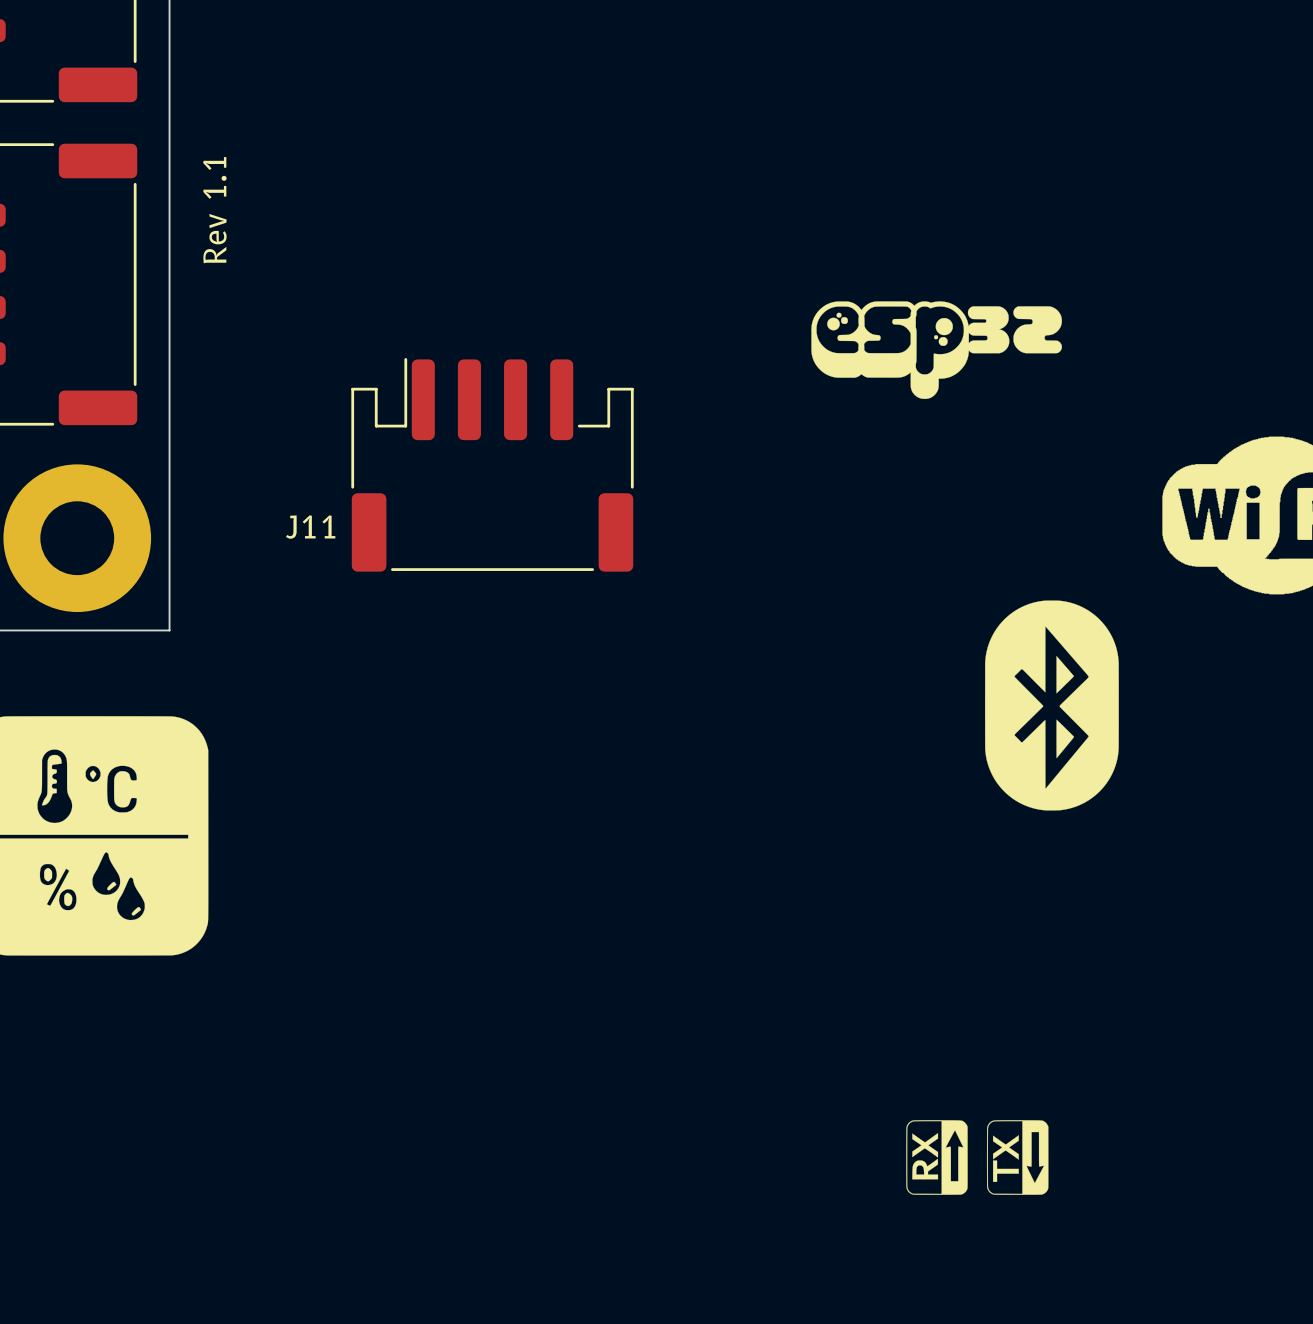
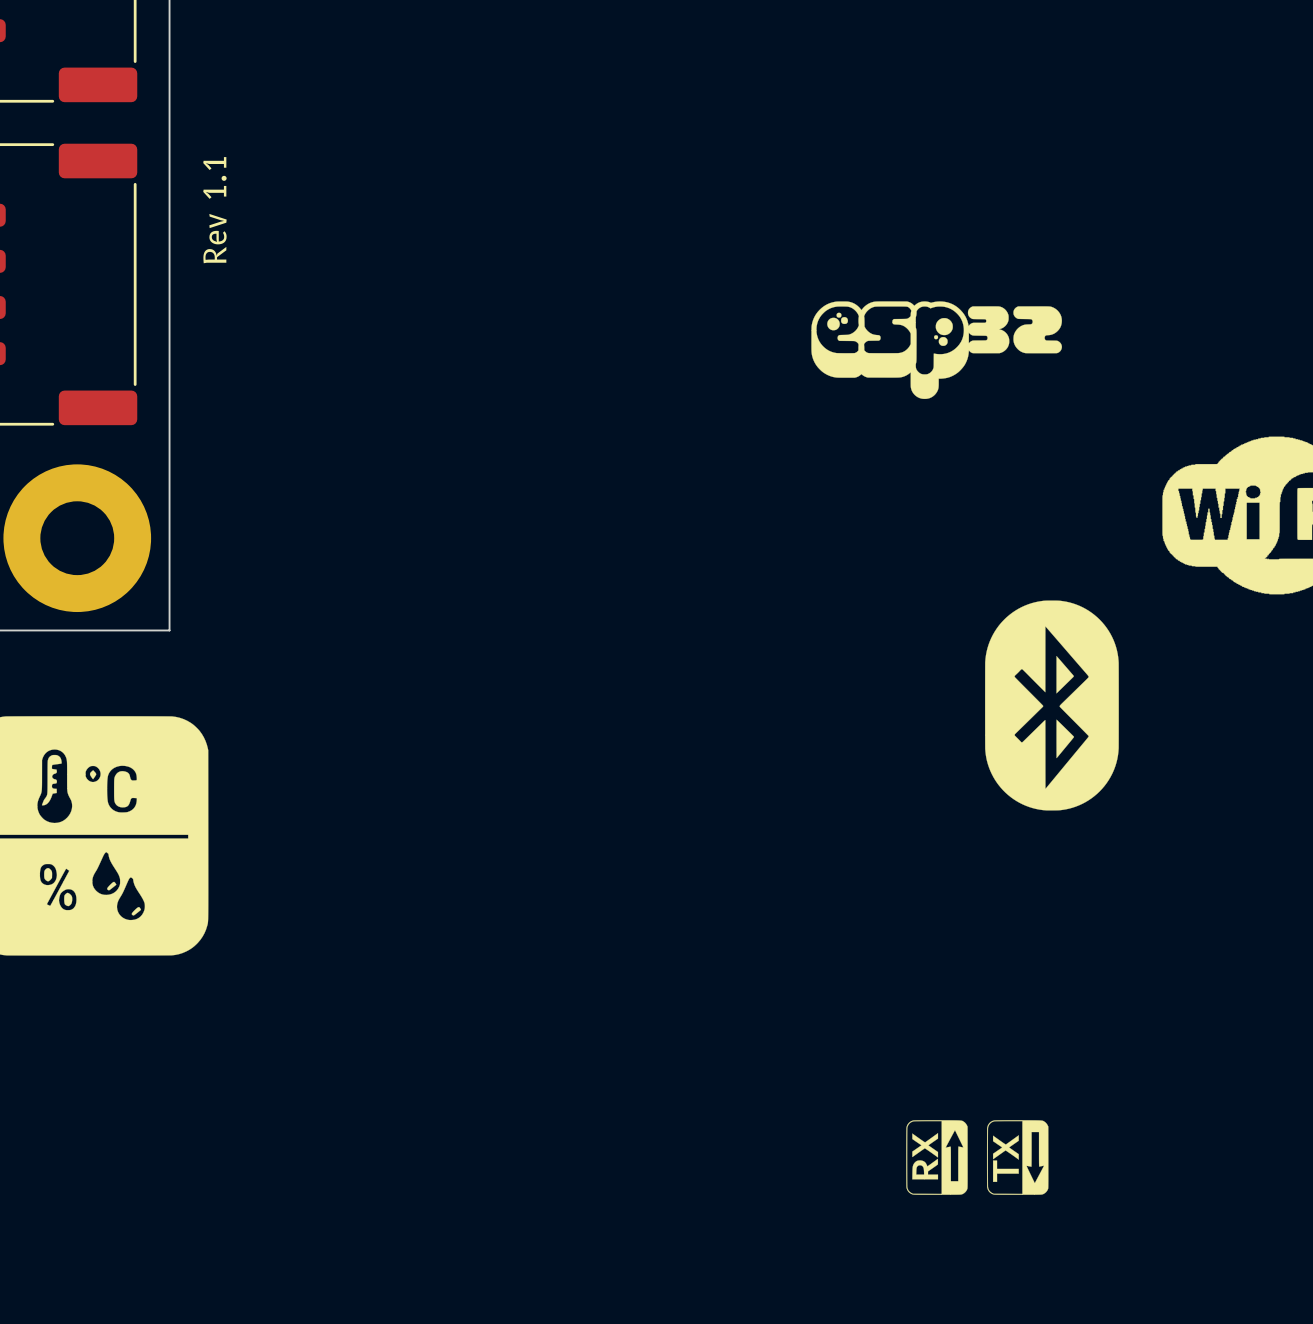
J11: (492, 464) -> none

